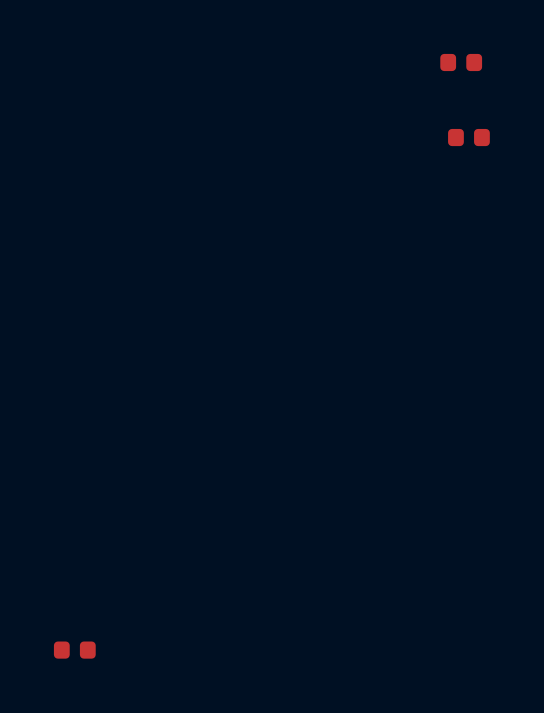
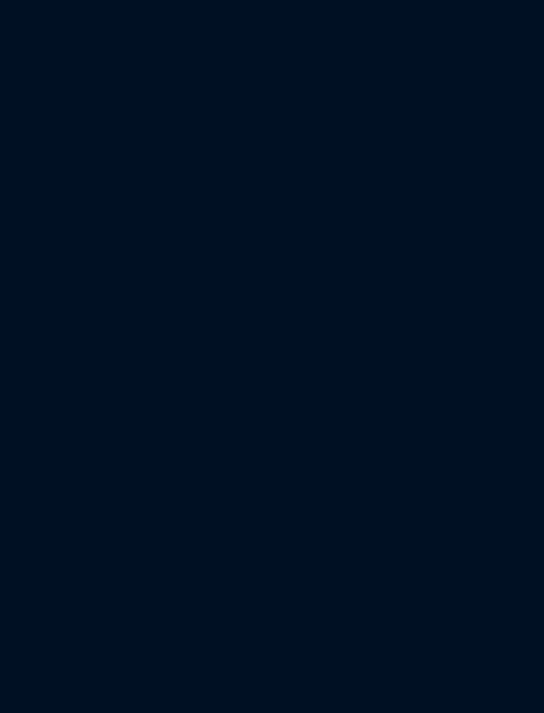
part: (461, 62) -> none
part: (468, 137) -> none
part: (74, 650) -> none

